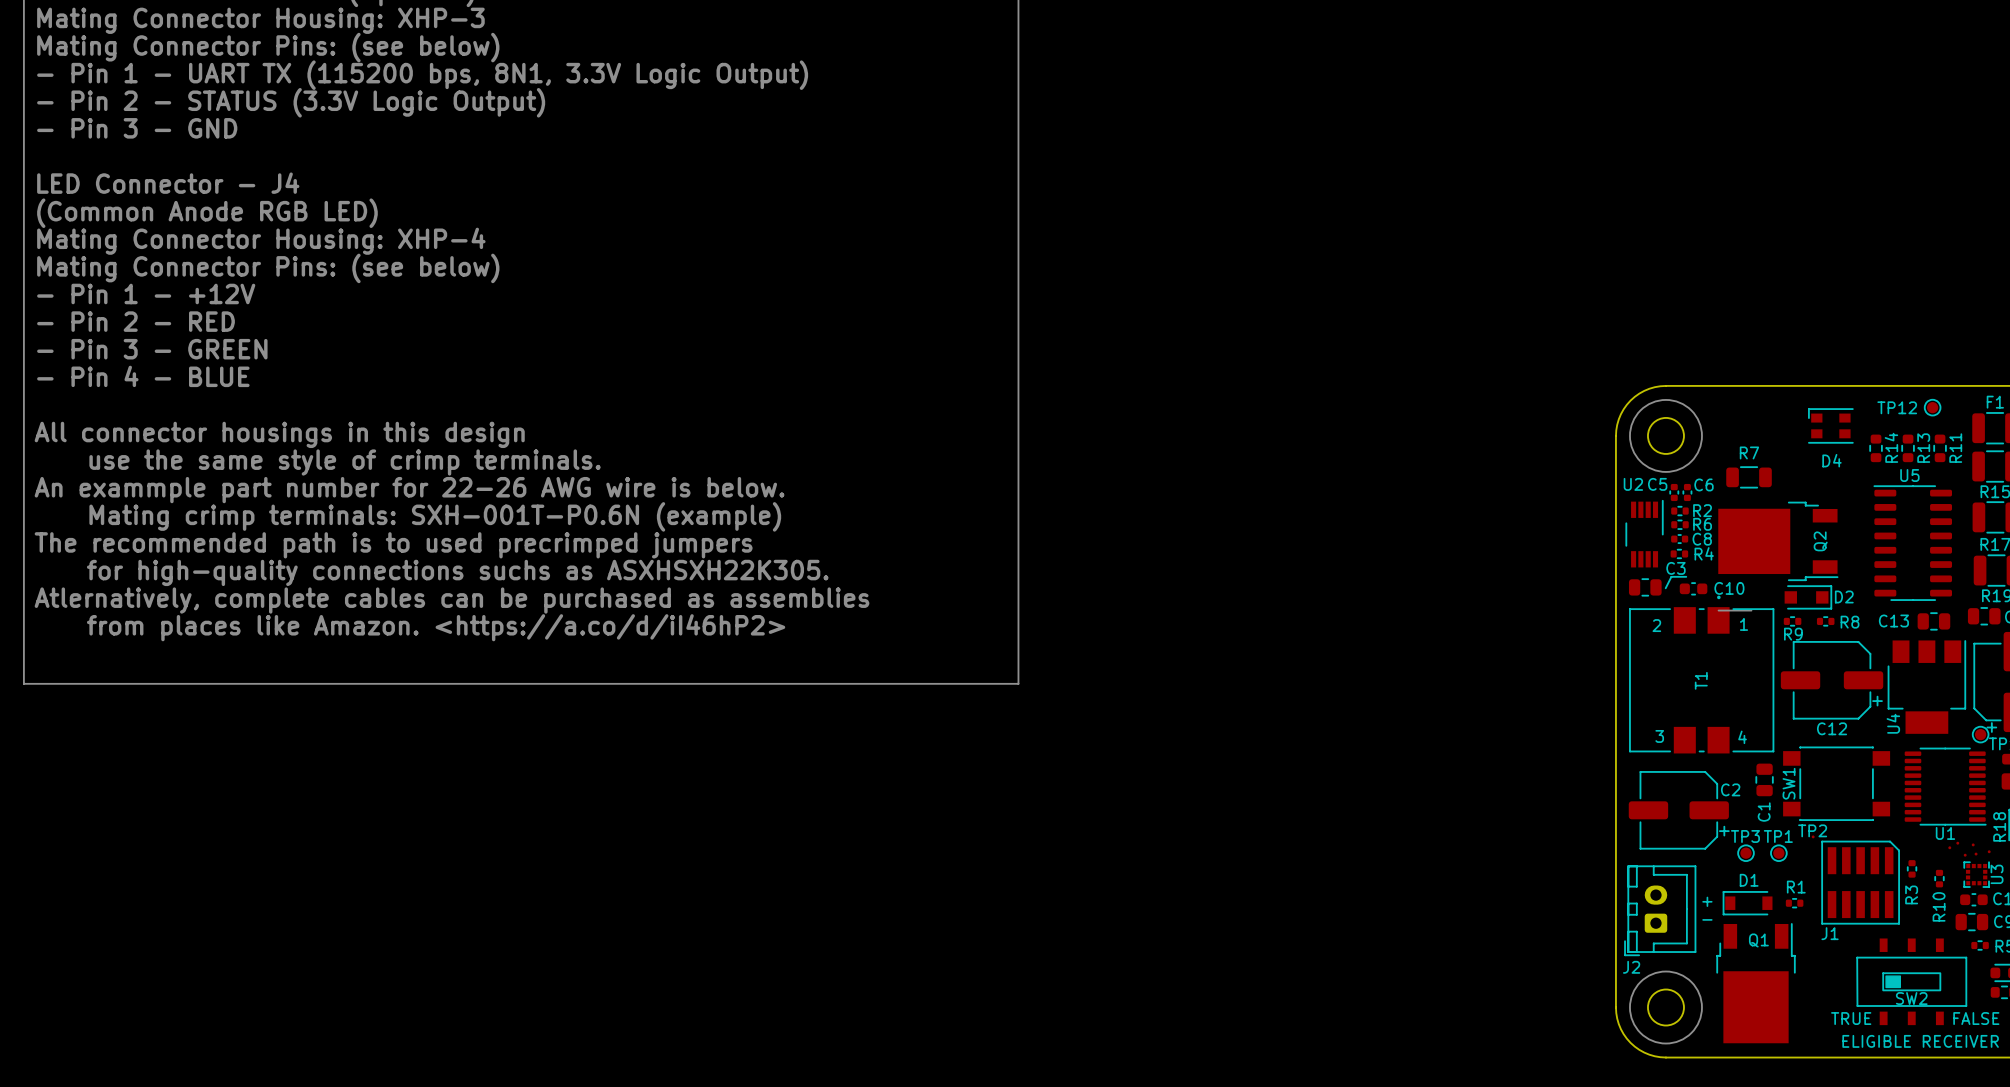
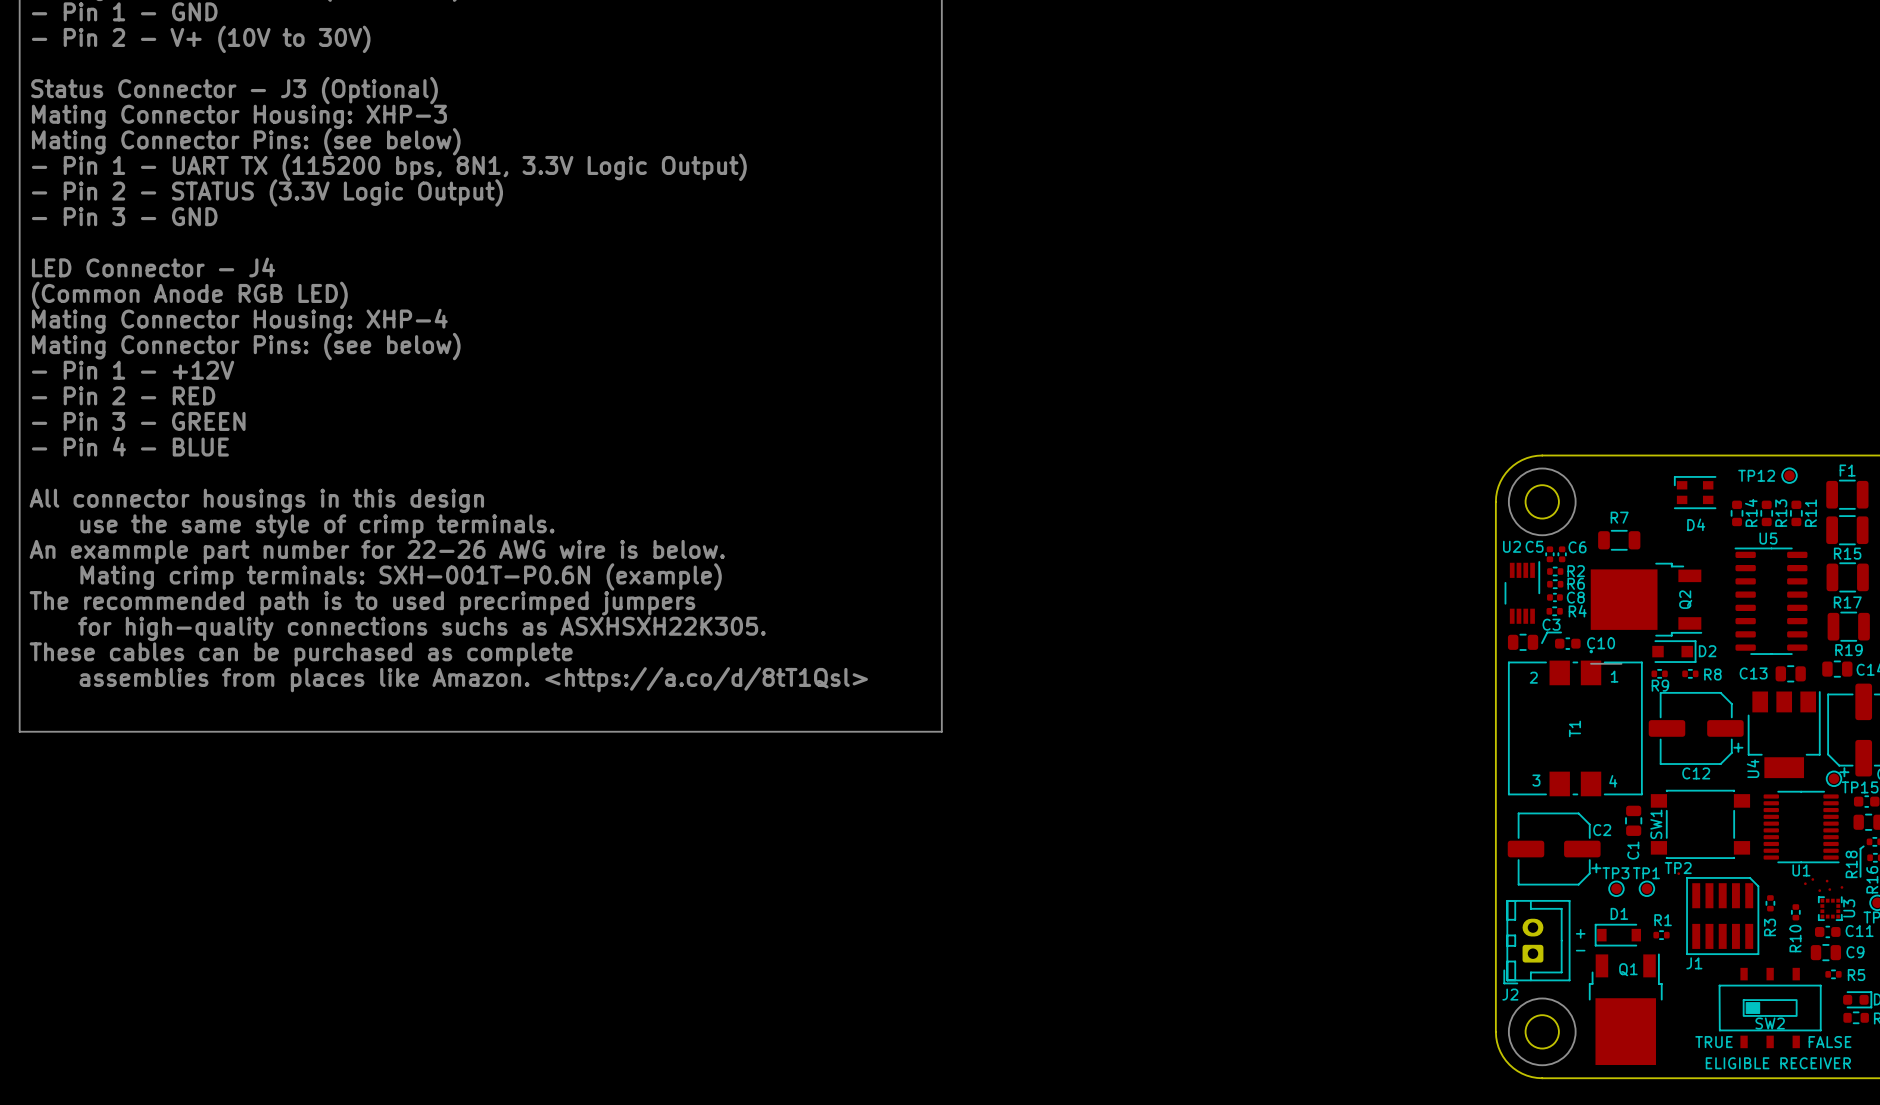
text: Atlernatively, complete cables can be purchased as assemblies (452, 600) -> These cables can be purchased as complete (301, 654)
text: from places like Amazon. <https://a.co/d/iI46hP2> (436, 627) -> assemblies from places like Amazon. <https://a.co/d/8tT1Qsl> (473, 679)

